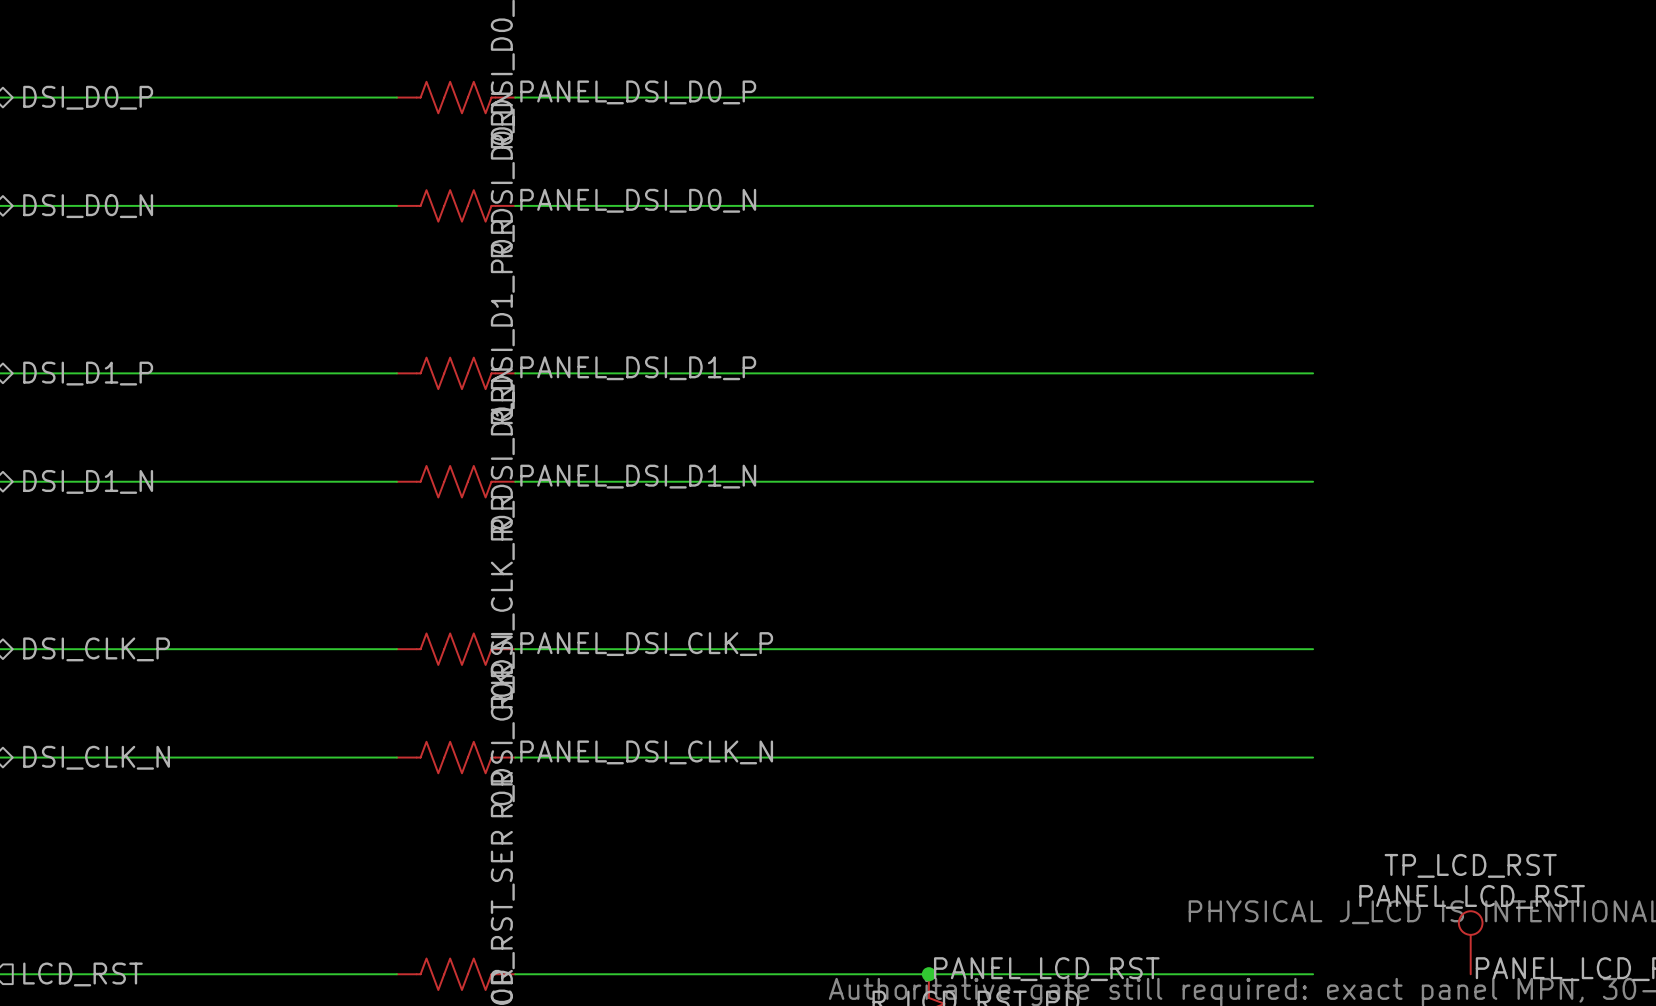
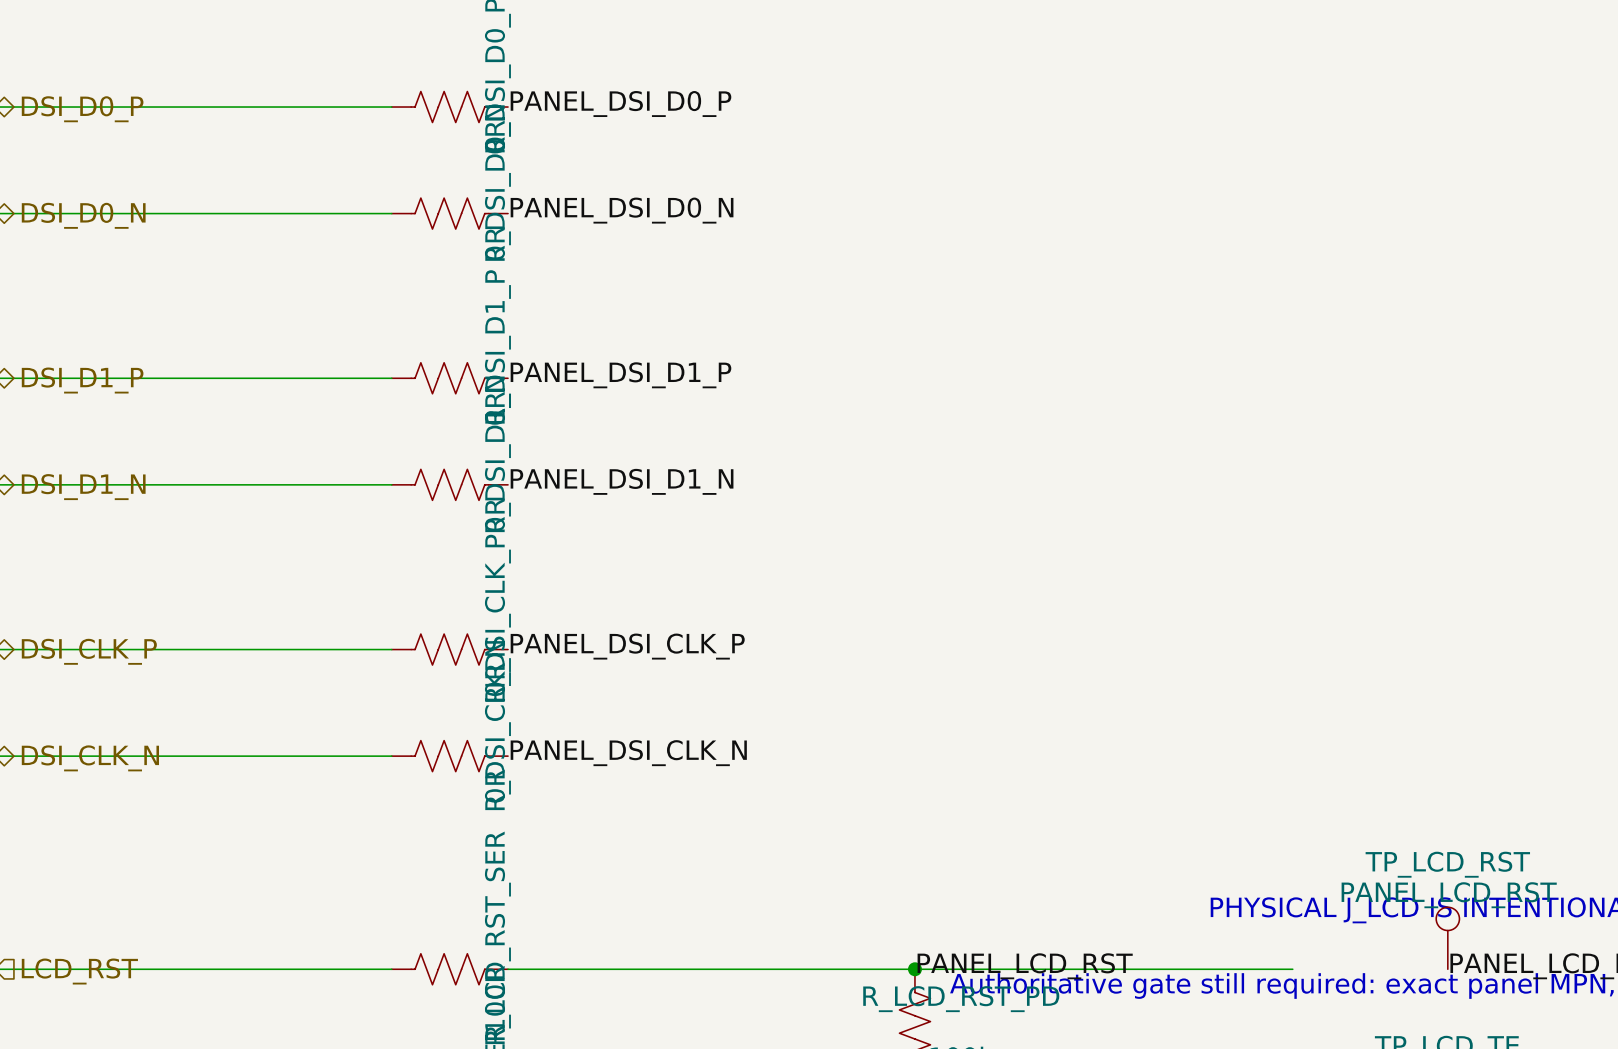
wire: (515, 97) (1313, 97) -> none
wire: (515, 205) (1313, 205) -> none
wire: (515, 373) (1313, 373) -> none
wire: (515, 481) (1313, 481) -> none
wire: (515, 649) (1313, 649) -> none
wire: (515, 757) (1313, 757) -> none

